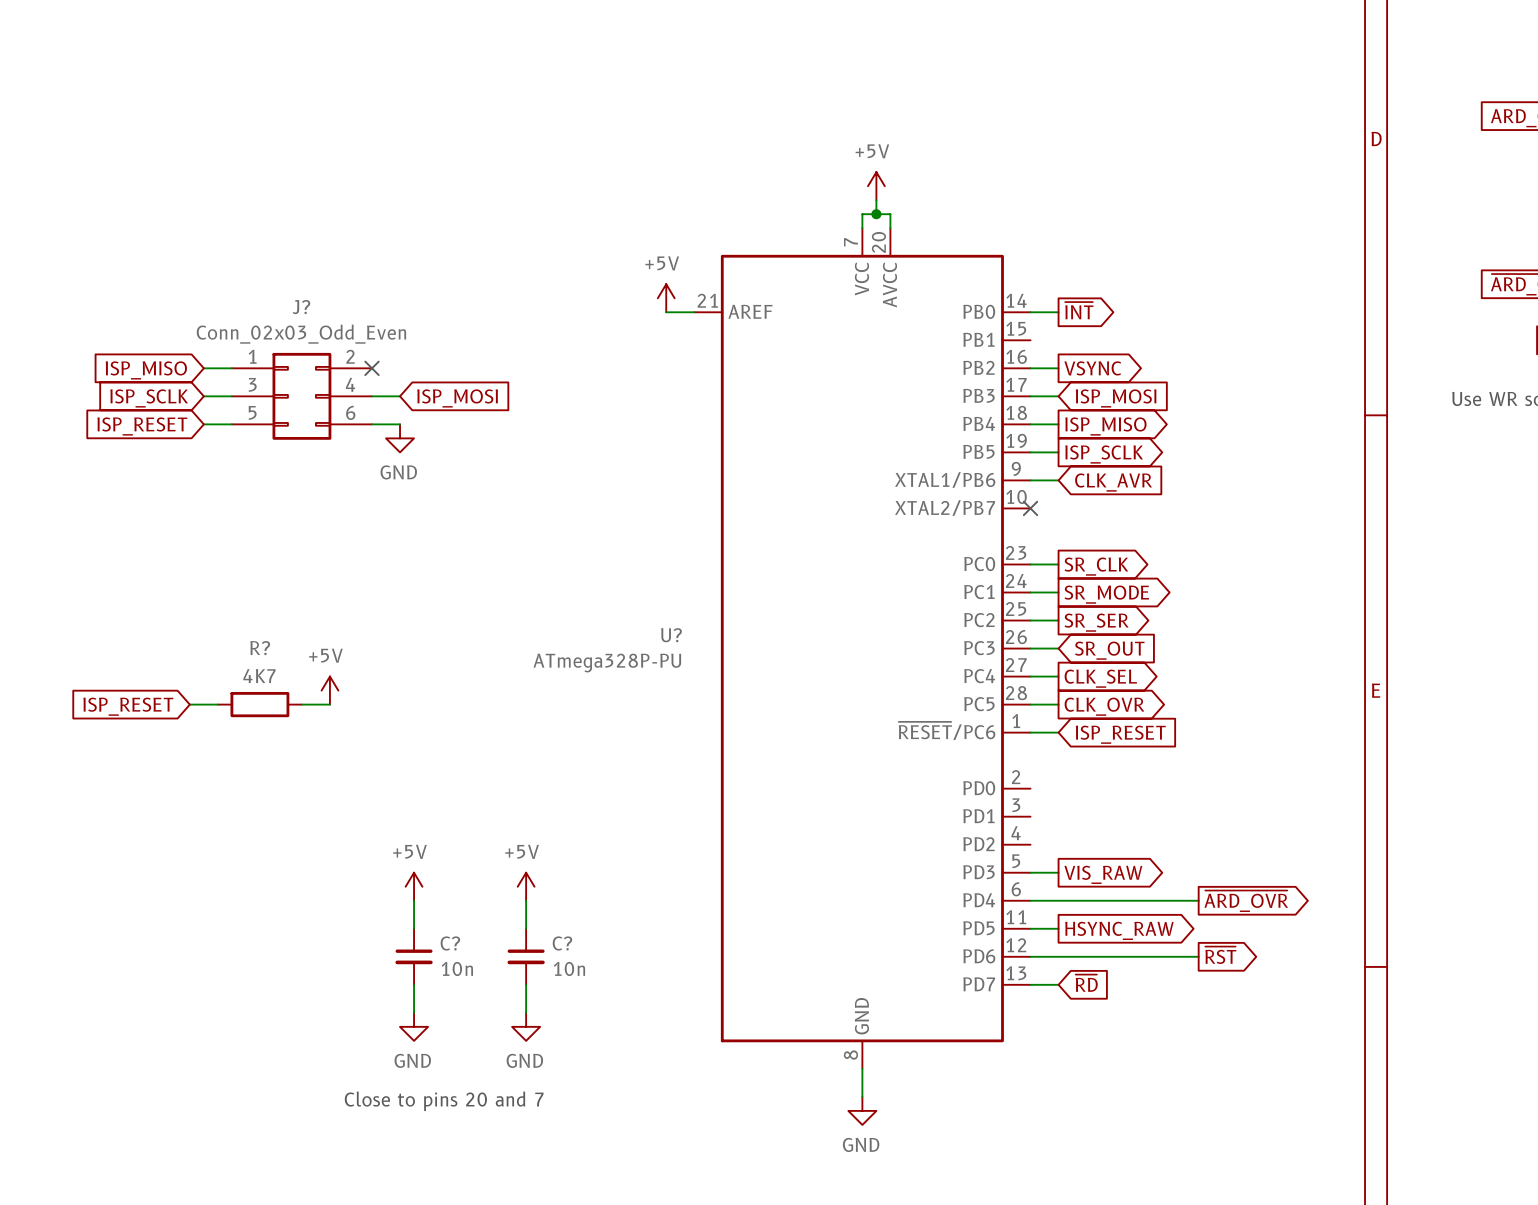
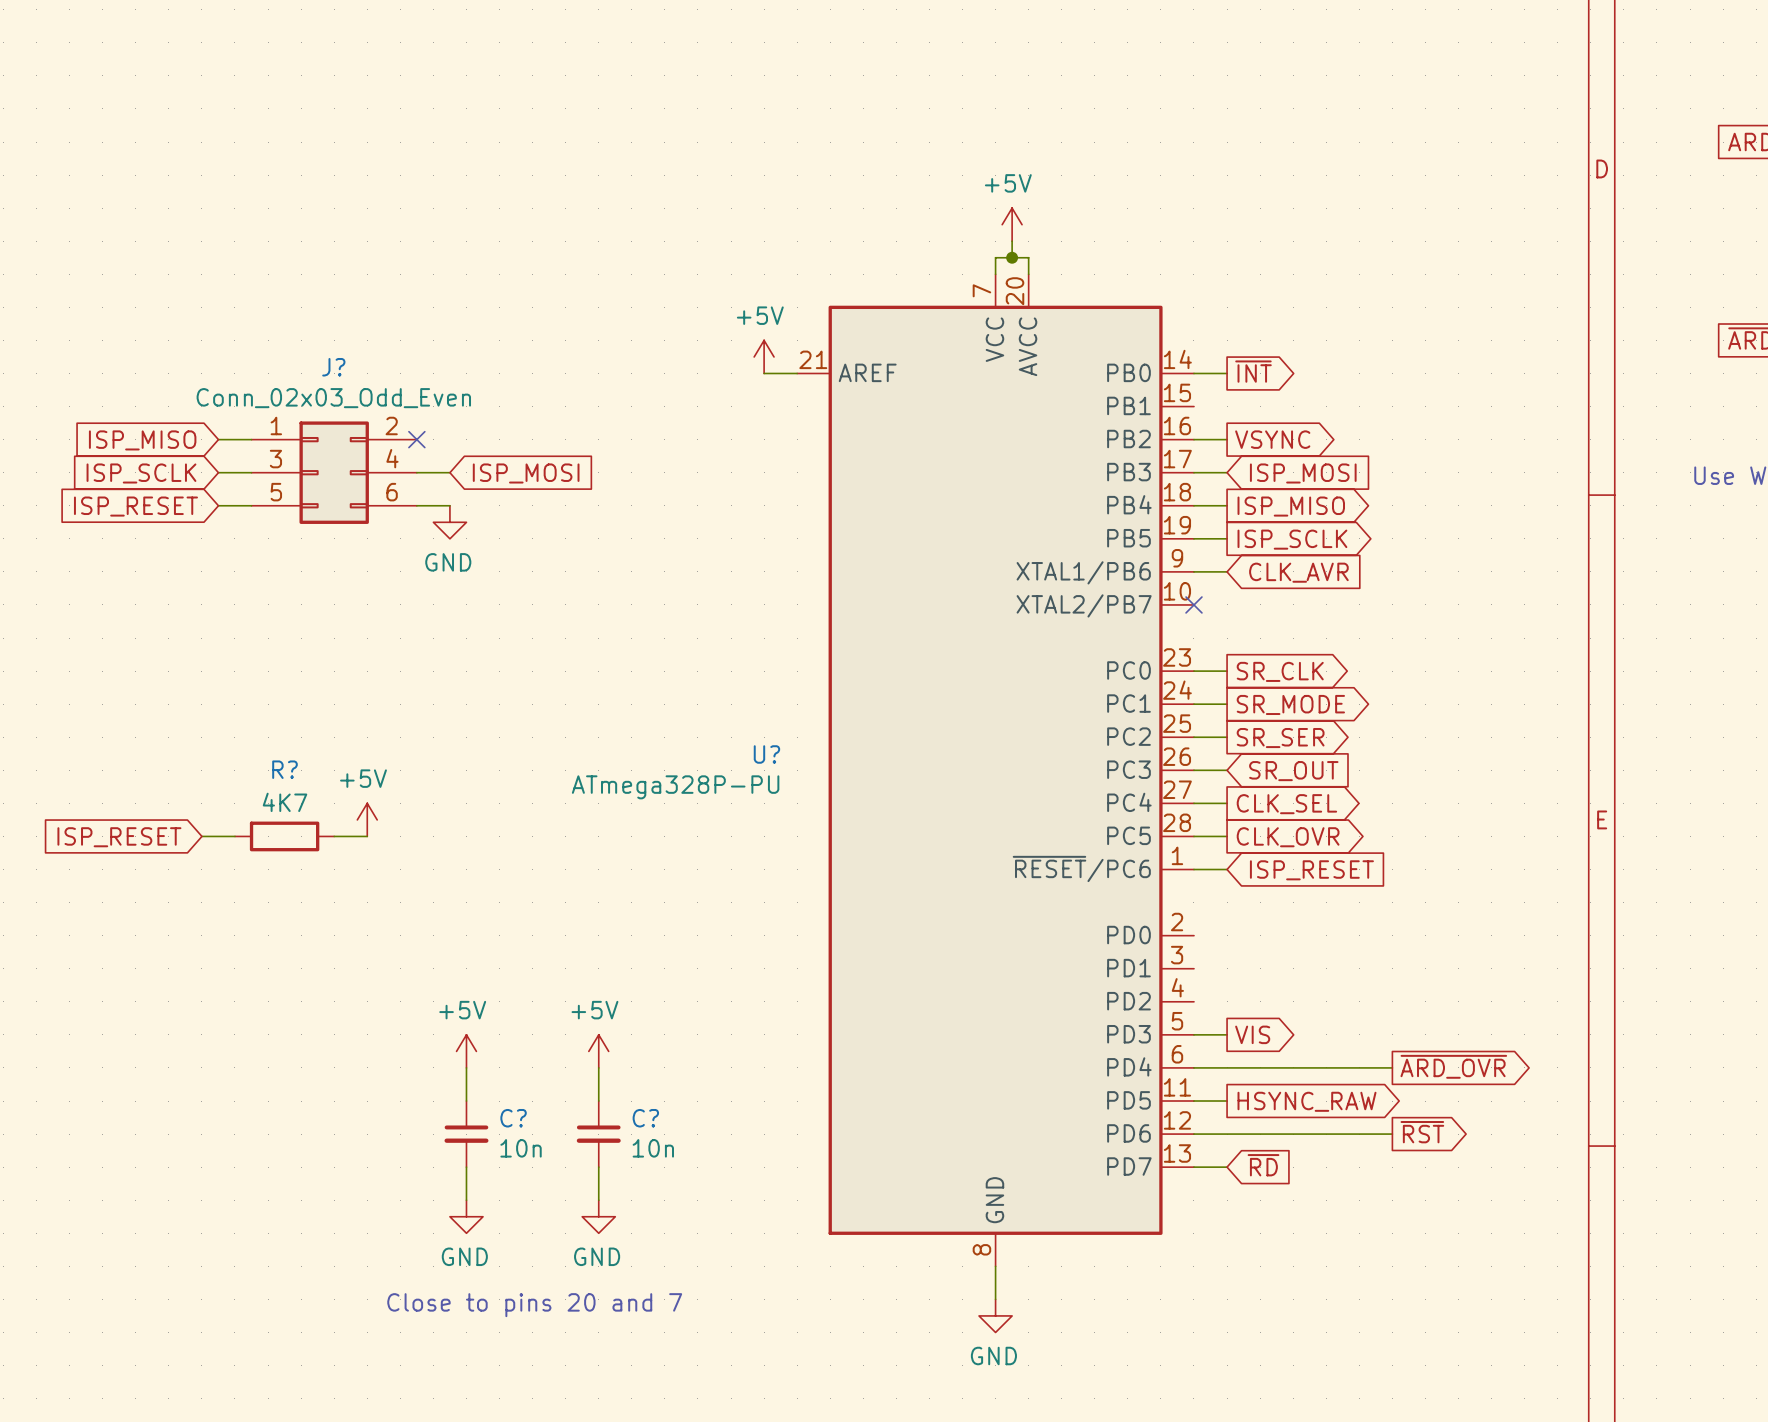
global label: VIS_RAW (1103, 874) -> VIS (1252, 1034)

